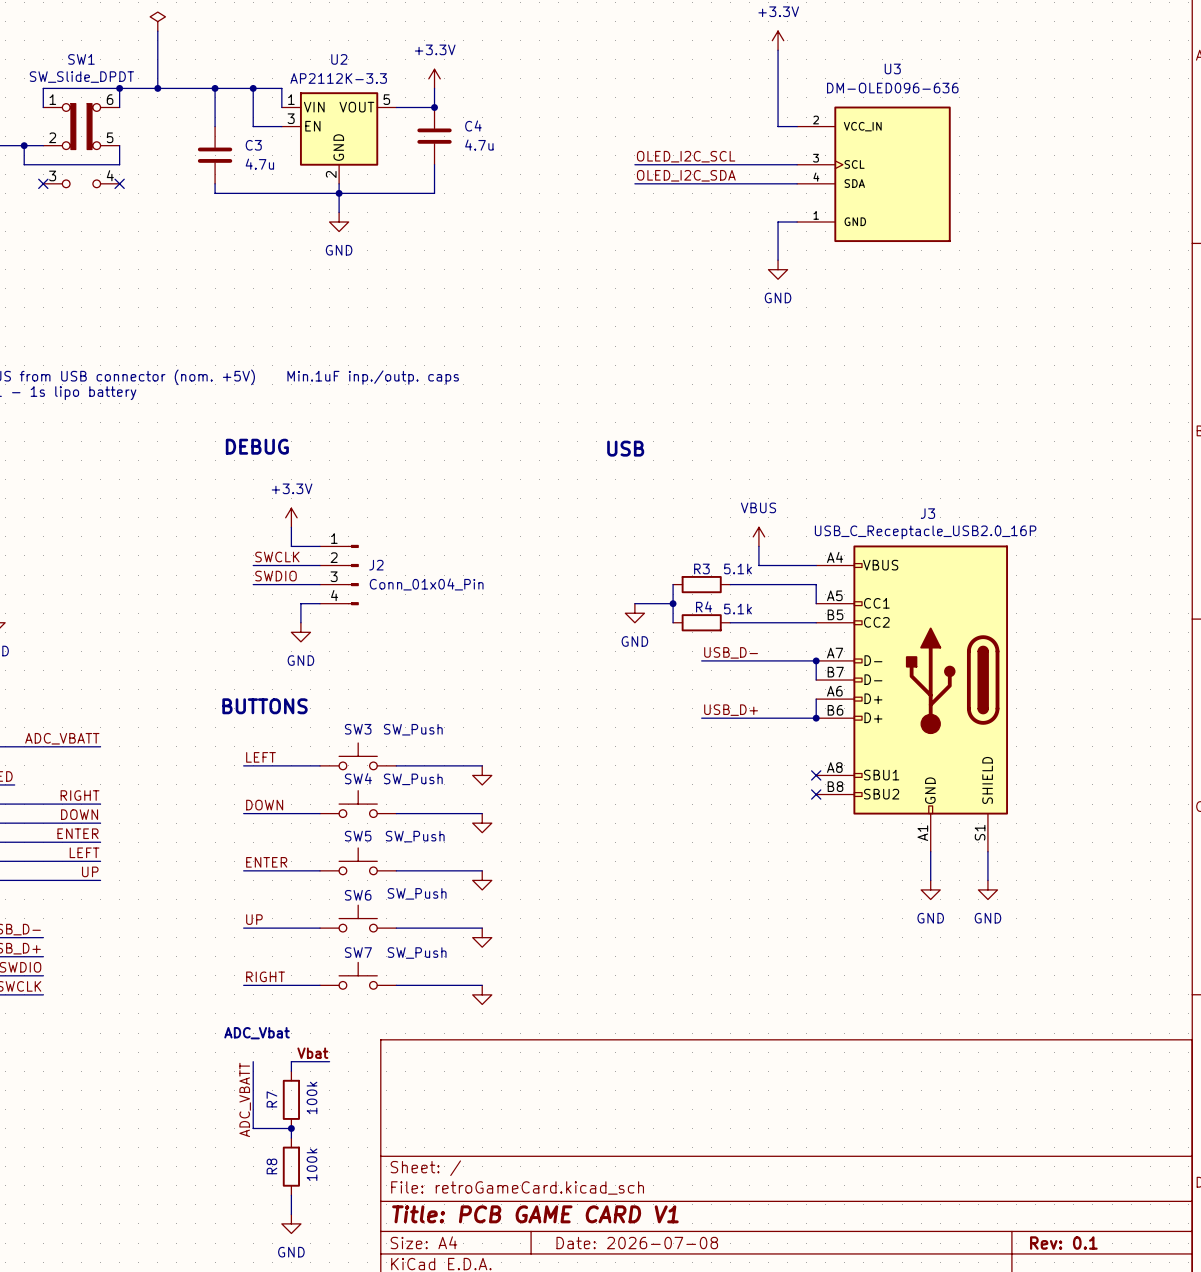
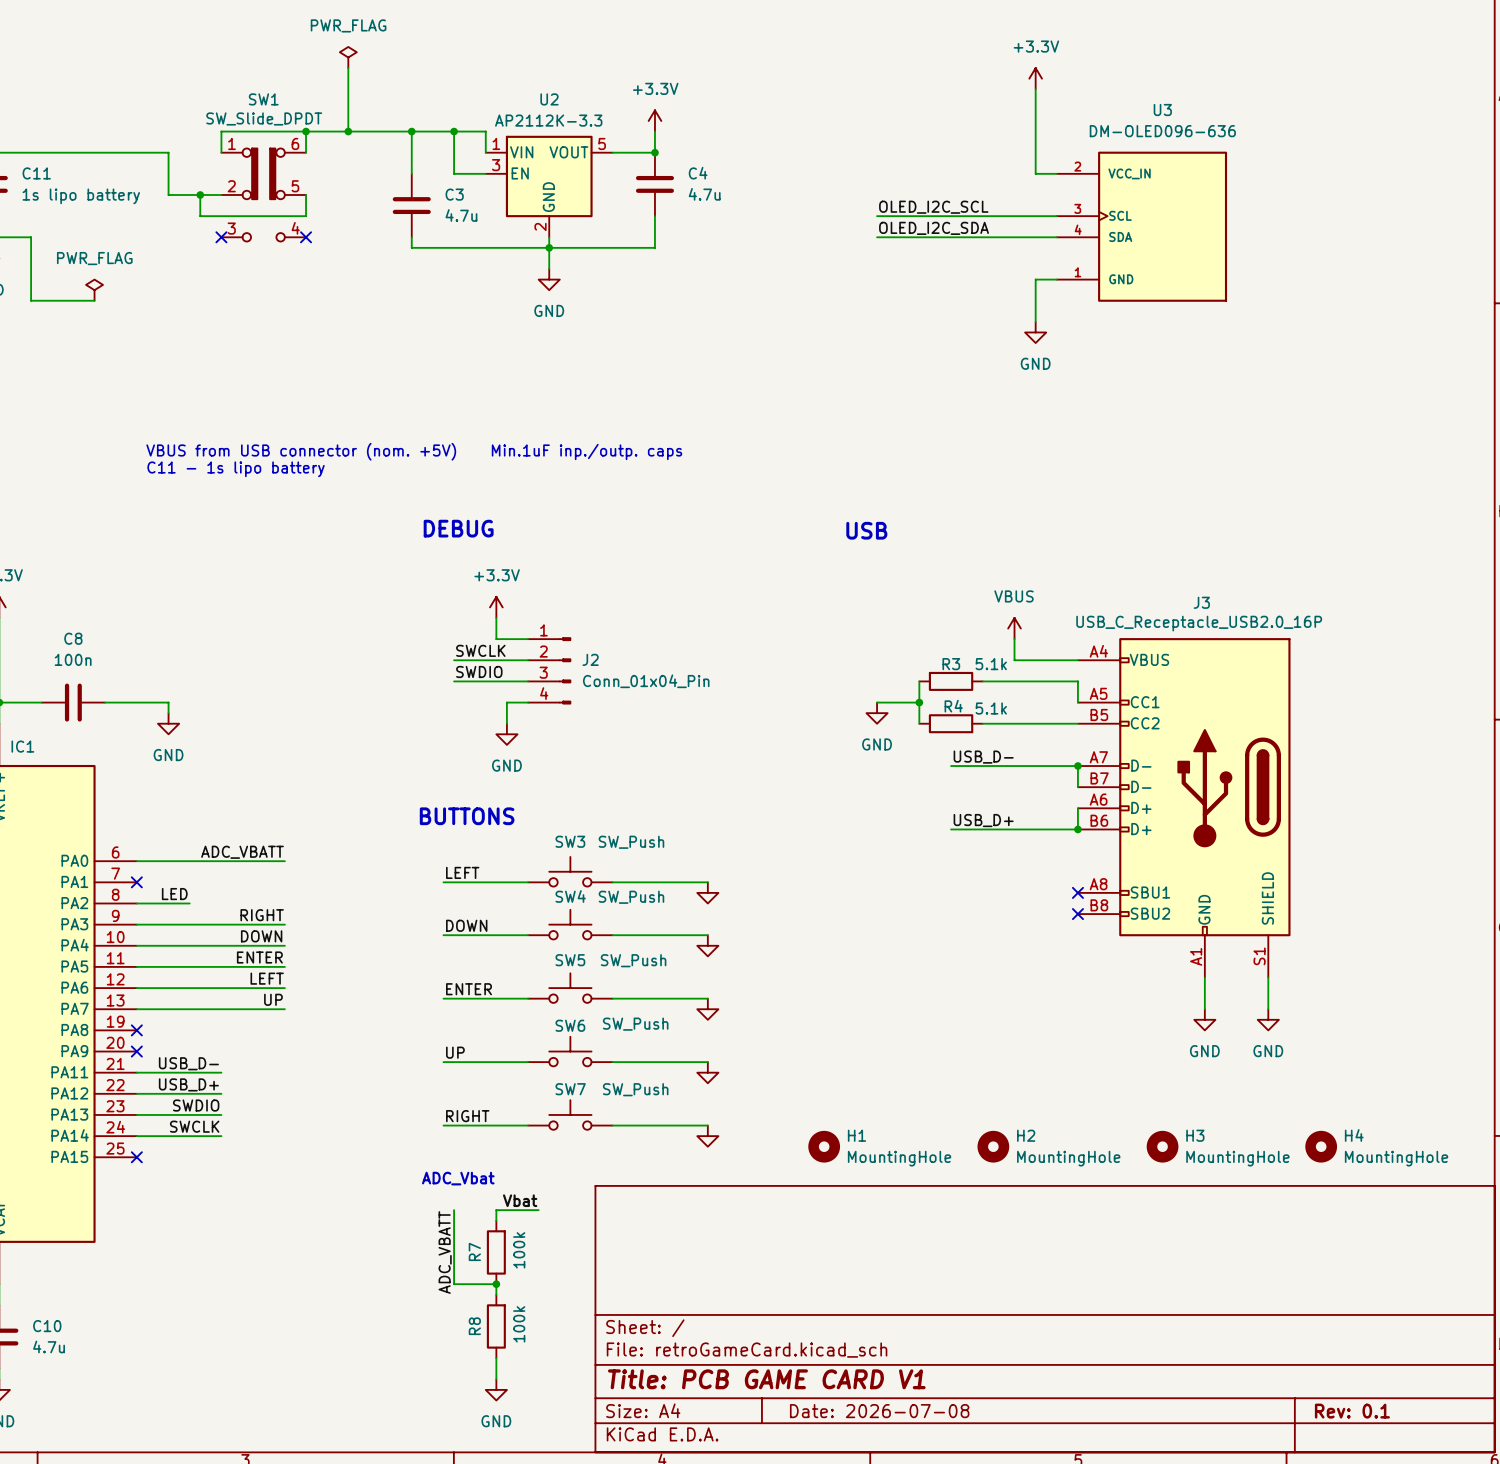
H1: none -> MountingHole (824, 1146)
H2: none -> MountingHole (993, 1146)
H3: none -> MountingHole (1162, 1146)
H4: none -> MountingHole (1321, 1146)

